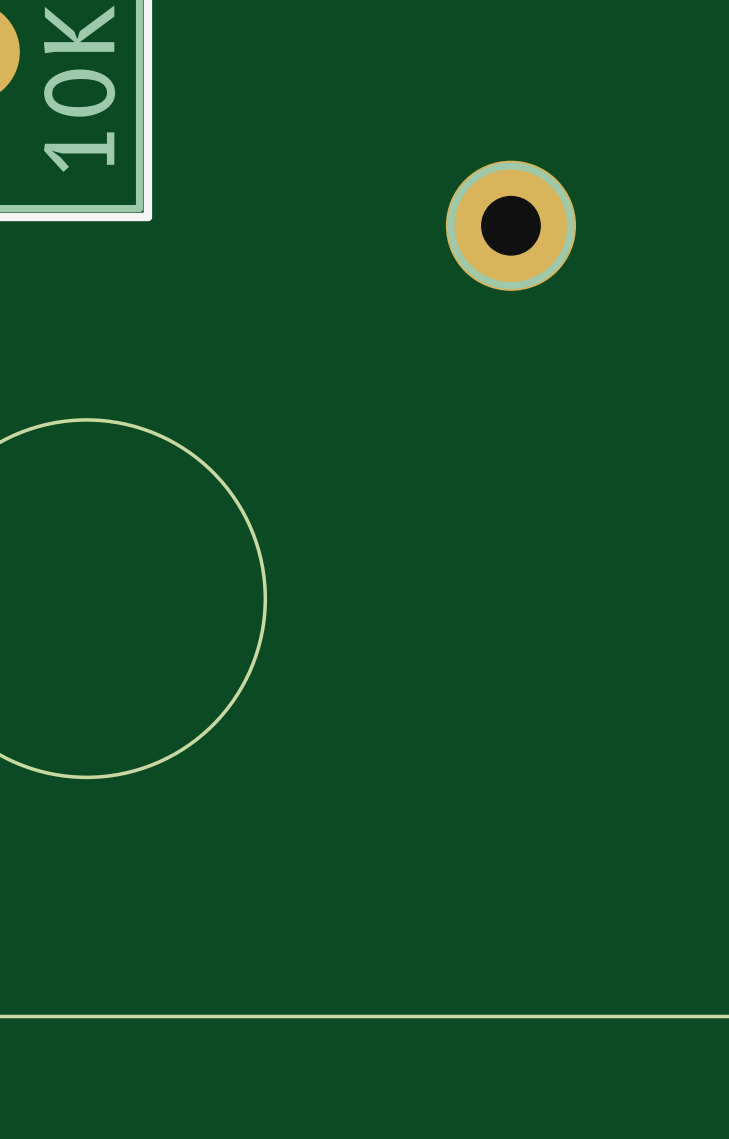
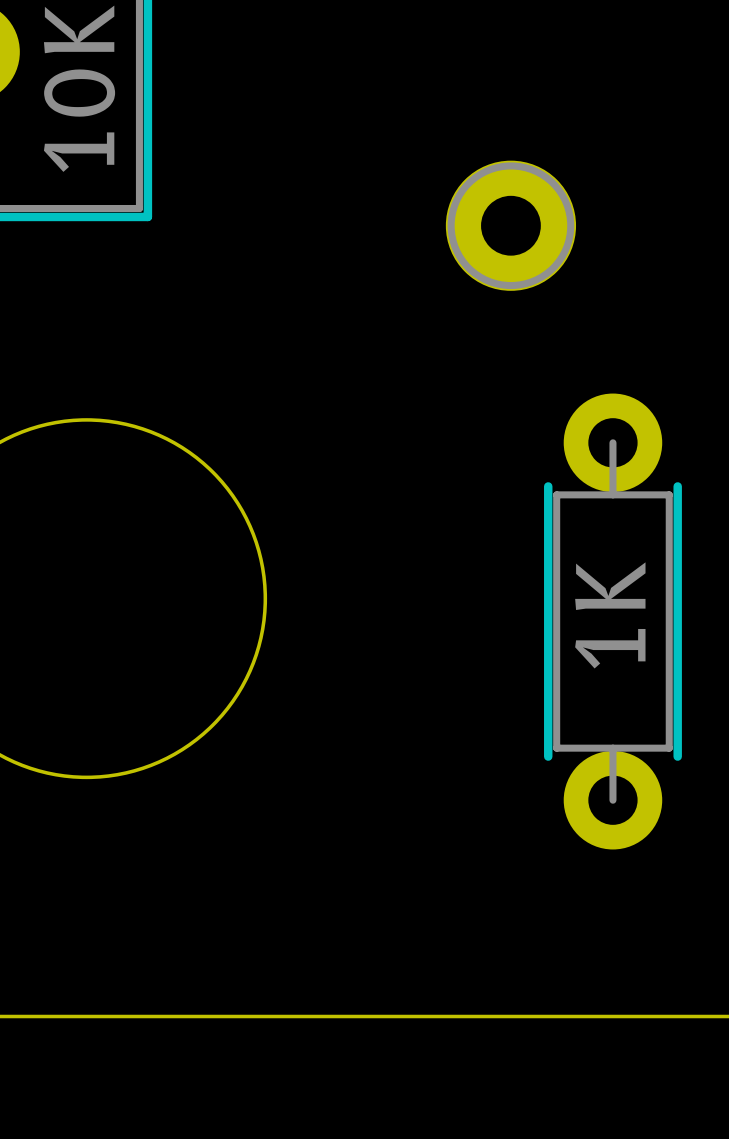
part: none -> 1K (612, 621)

